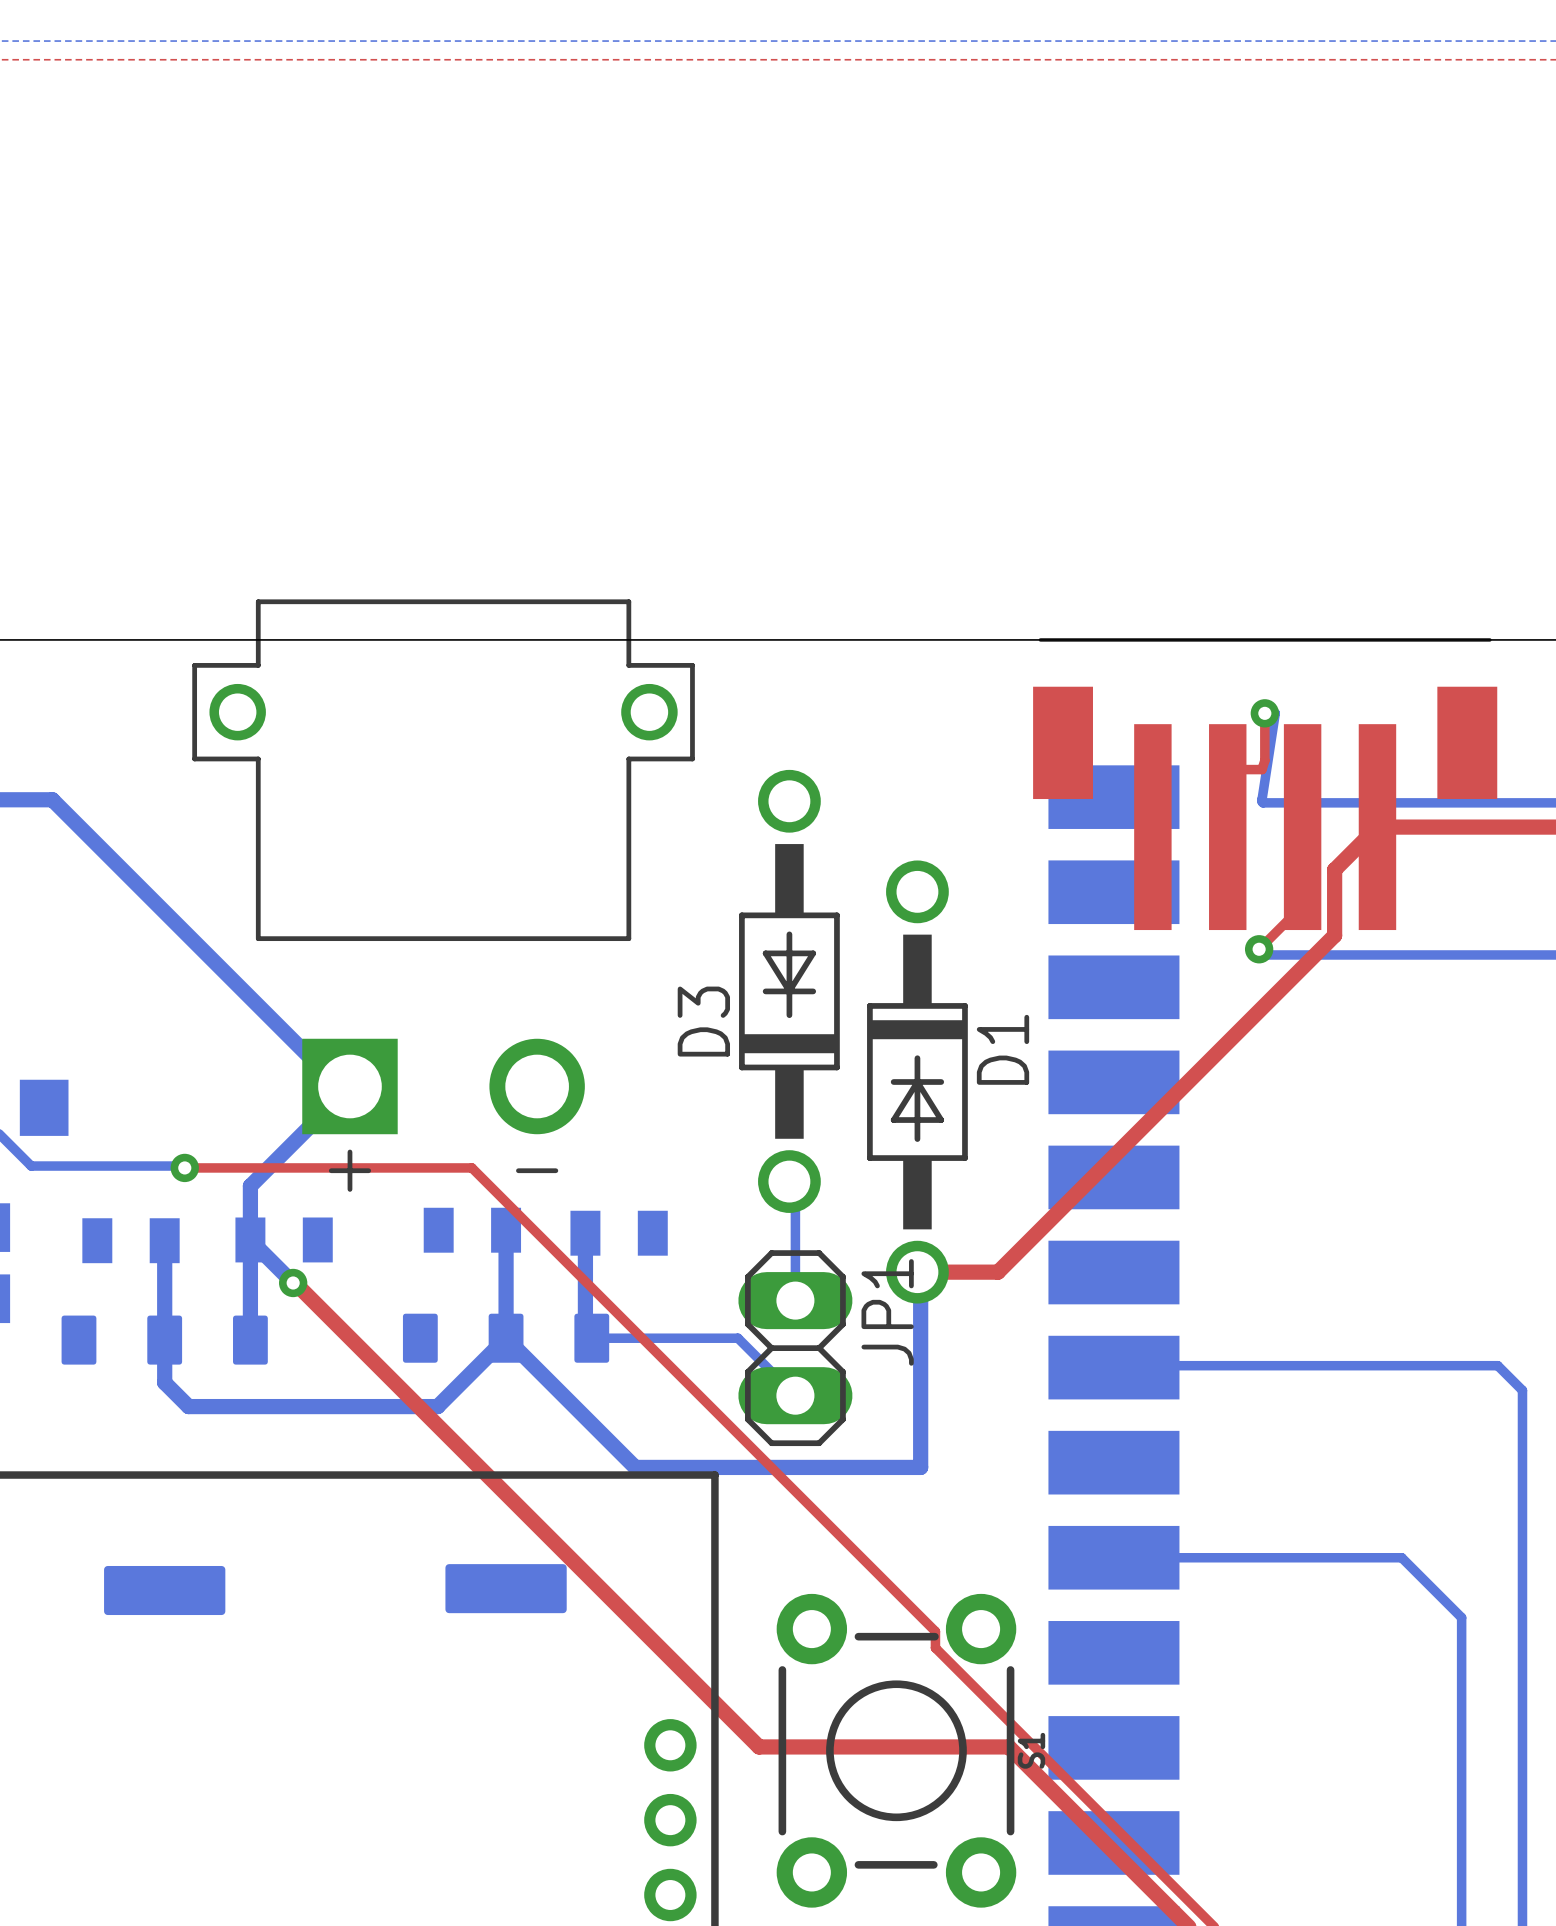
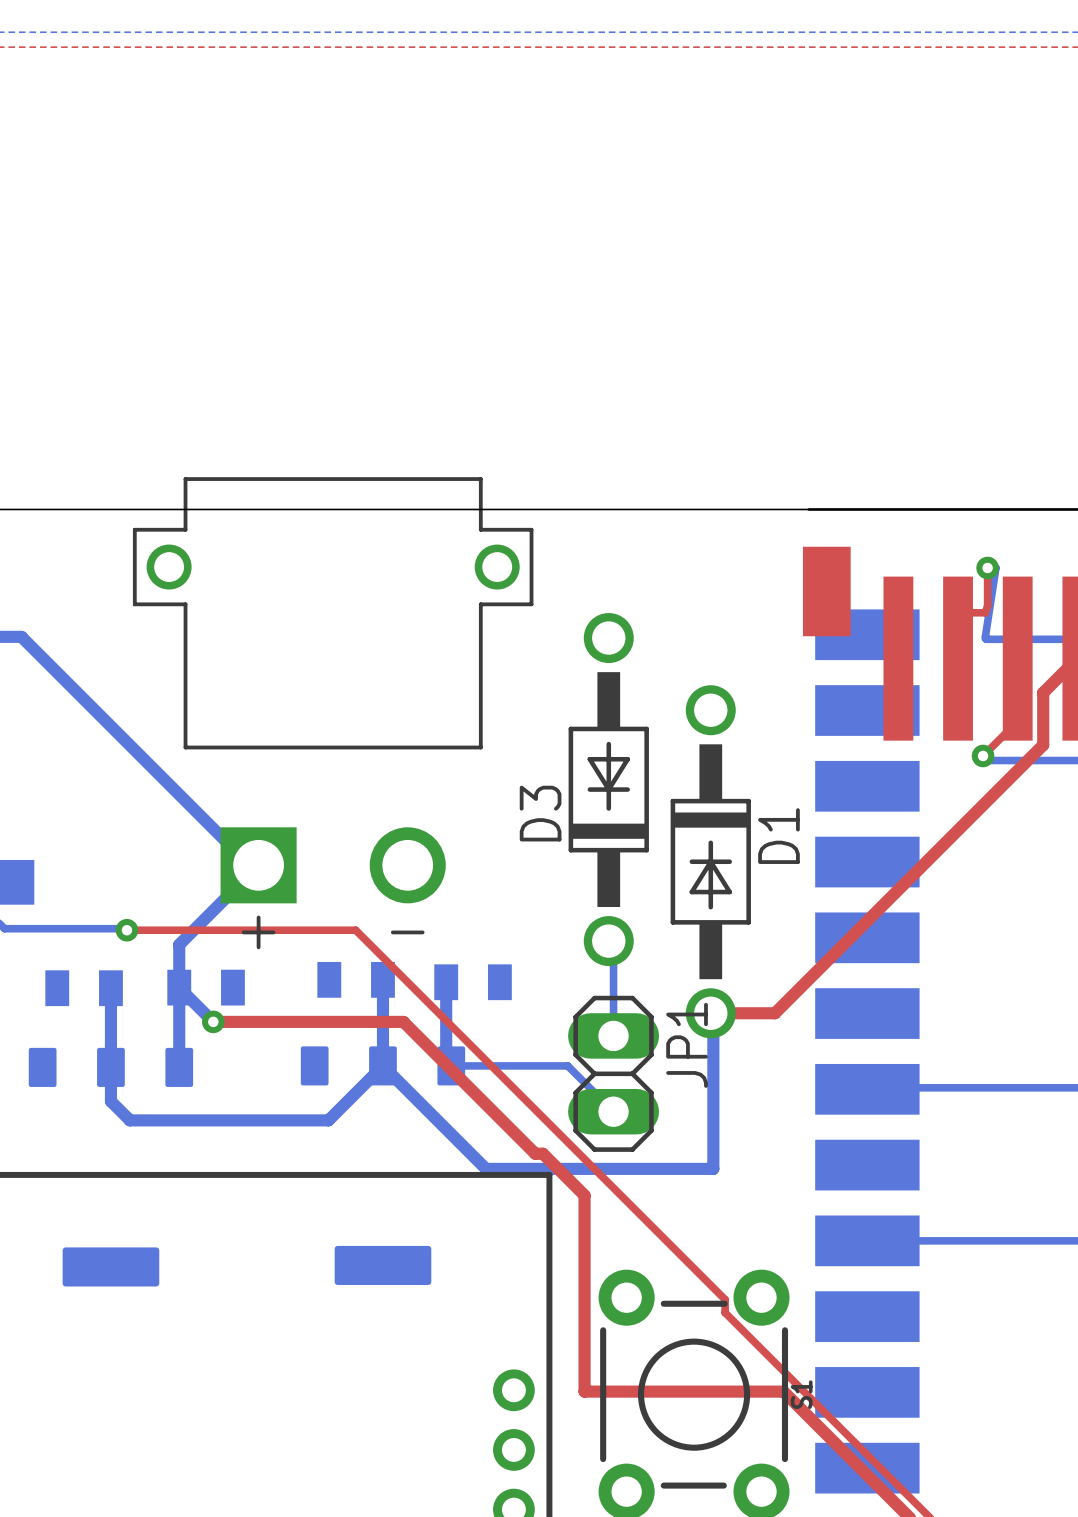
top track: (293, 1282) (759, 1746) -> (213, 1021) (403, 1021) (535, 1153) (542, 1153) (584, 1195) (584, 1391)

